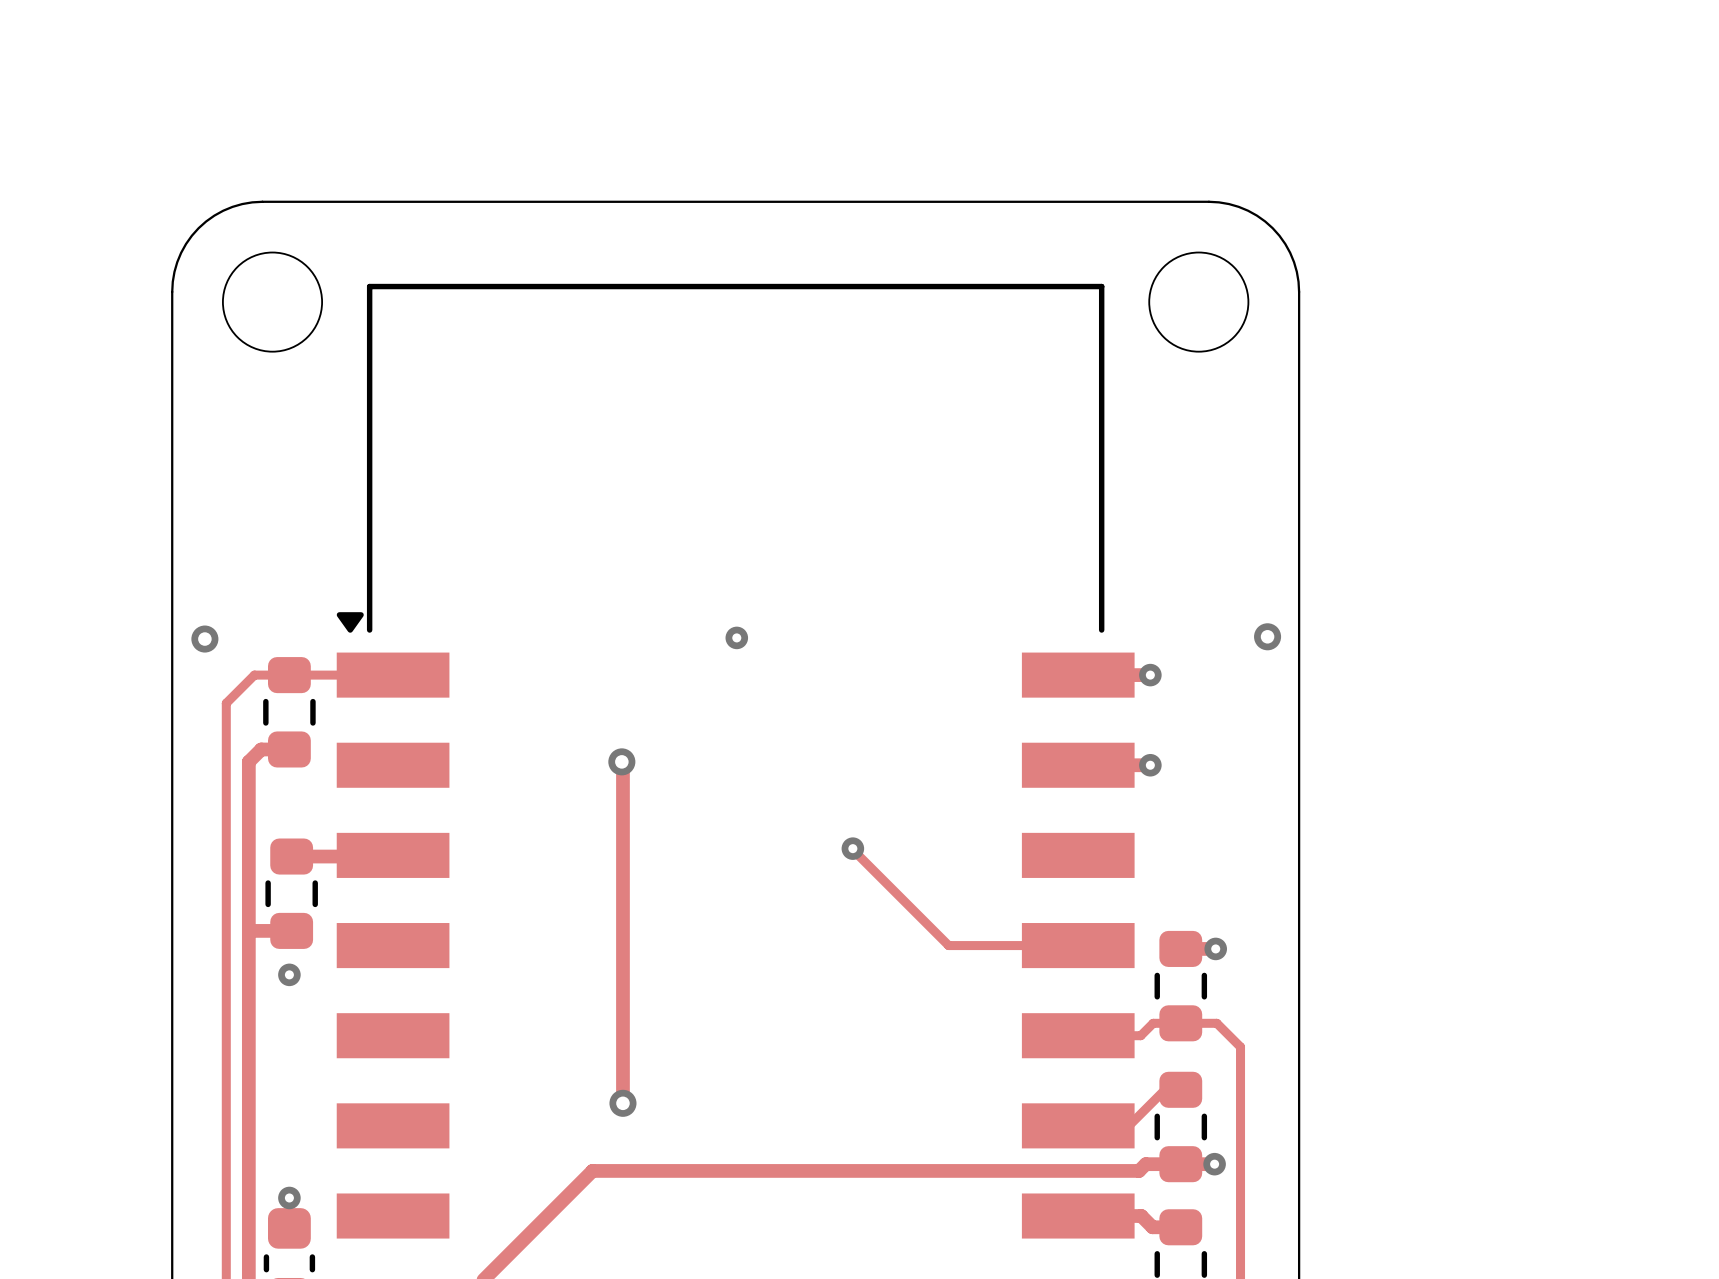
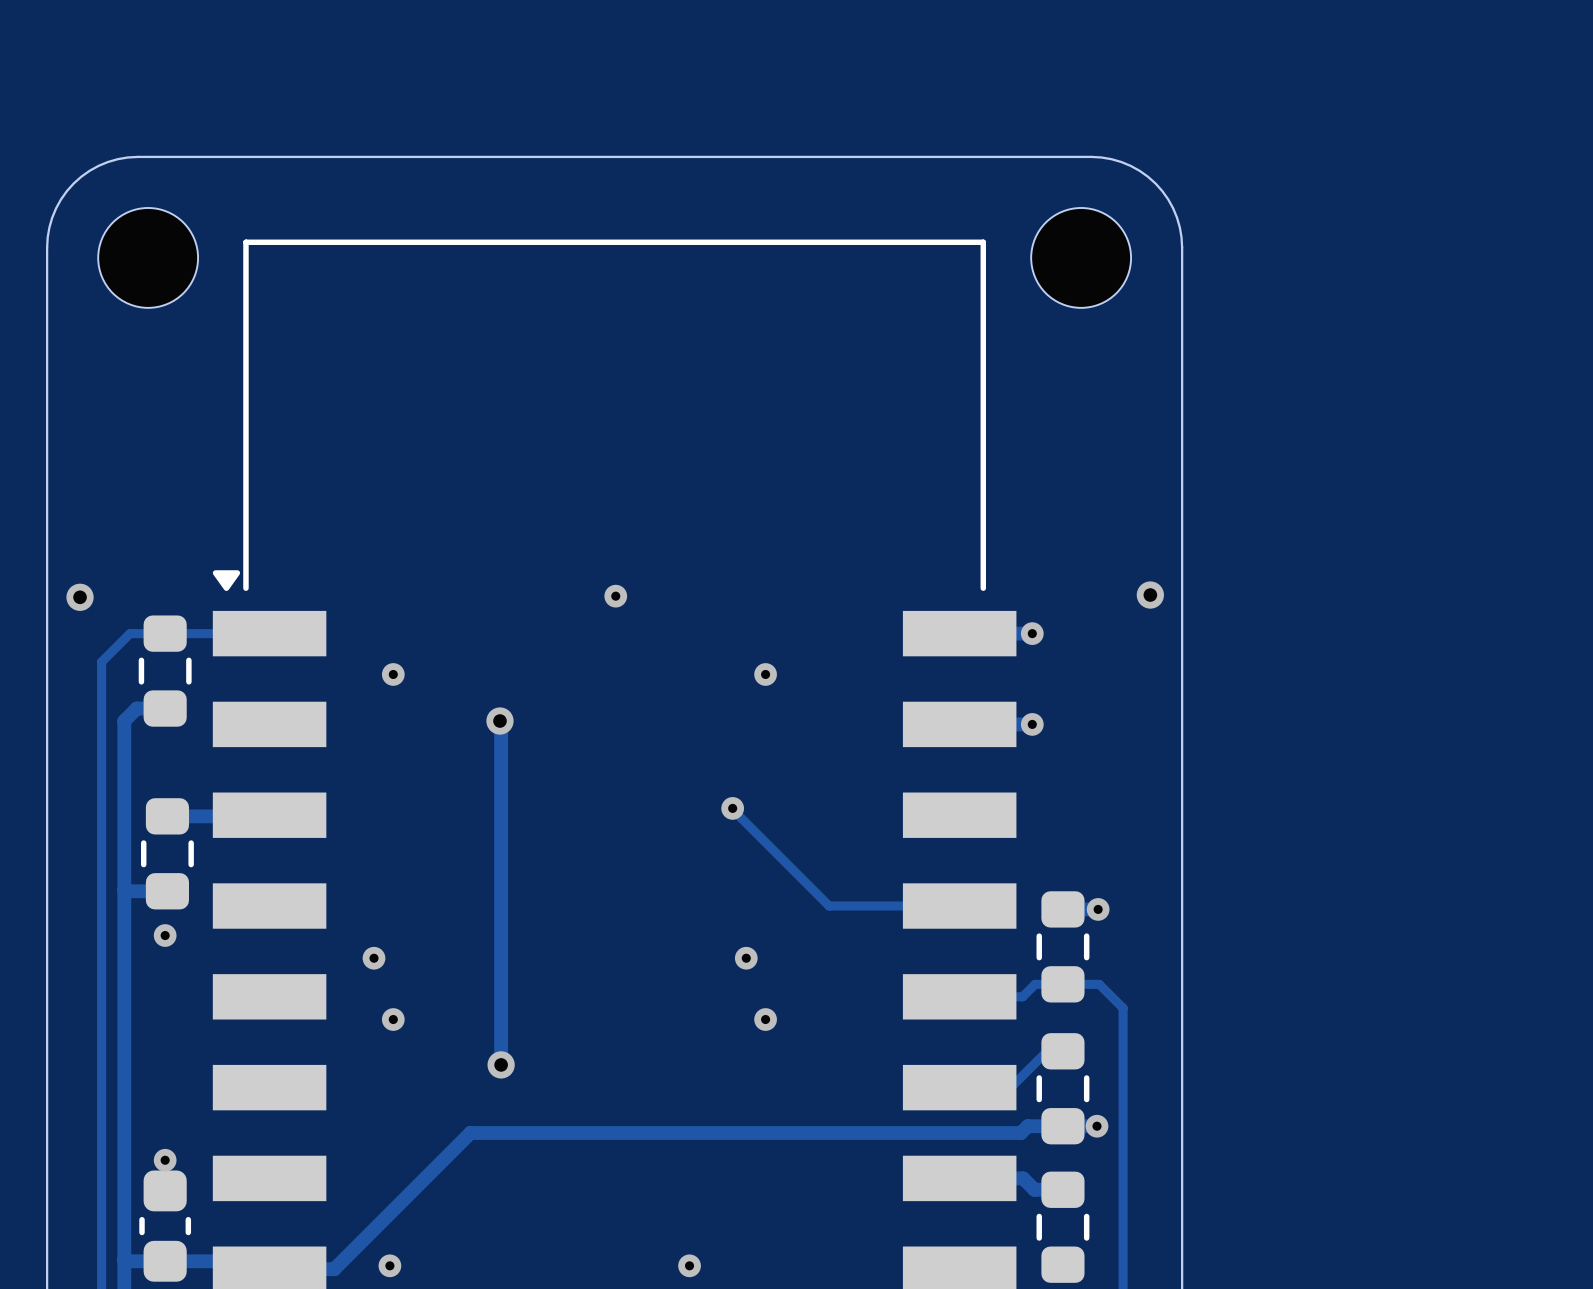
via: none -> (393, 674)
via: none -> (765, 674)
via: none -> (374, 958)
via: none -> (746, 958)
via: none -> (393, 1019)
via: none -> (765, 1019)

